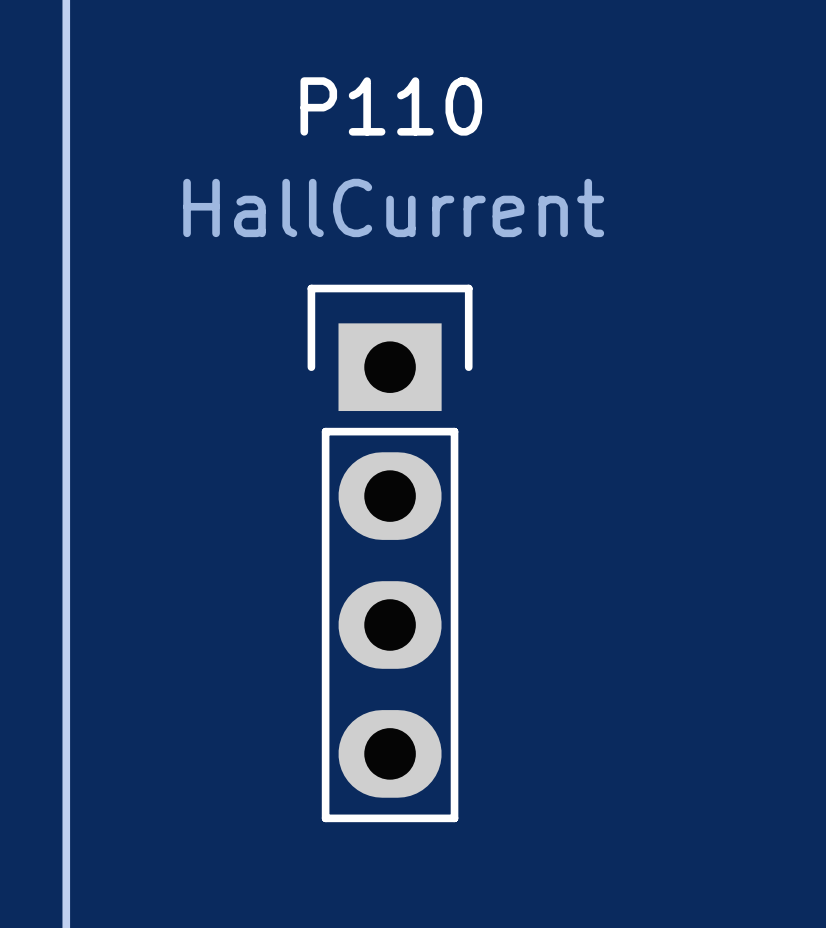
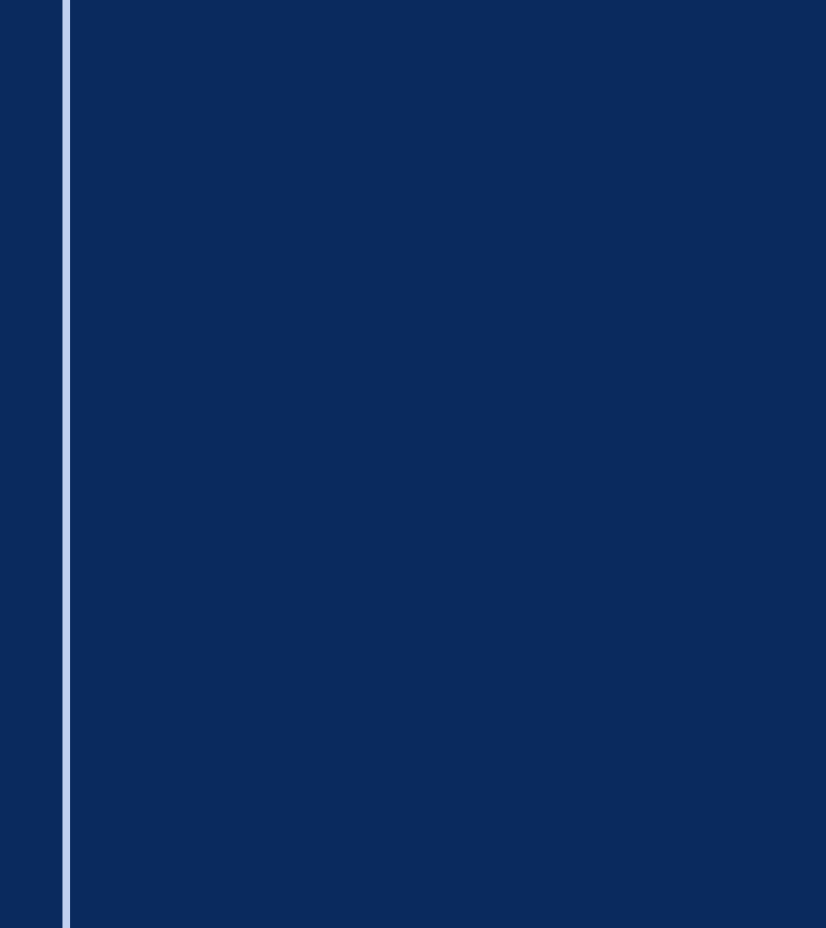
P110: HallCurrent (390, 553) -> none

